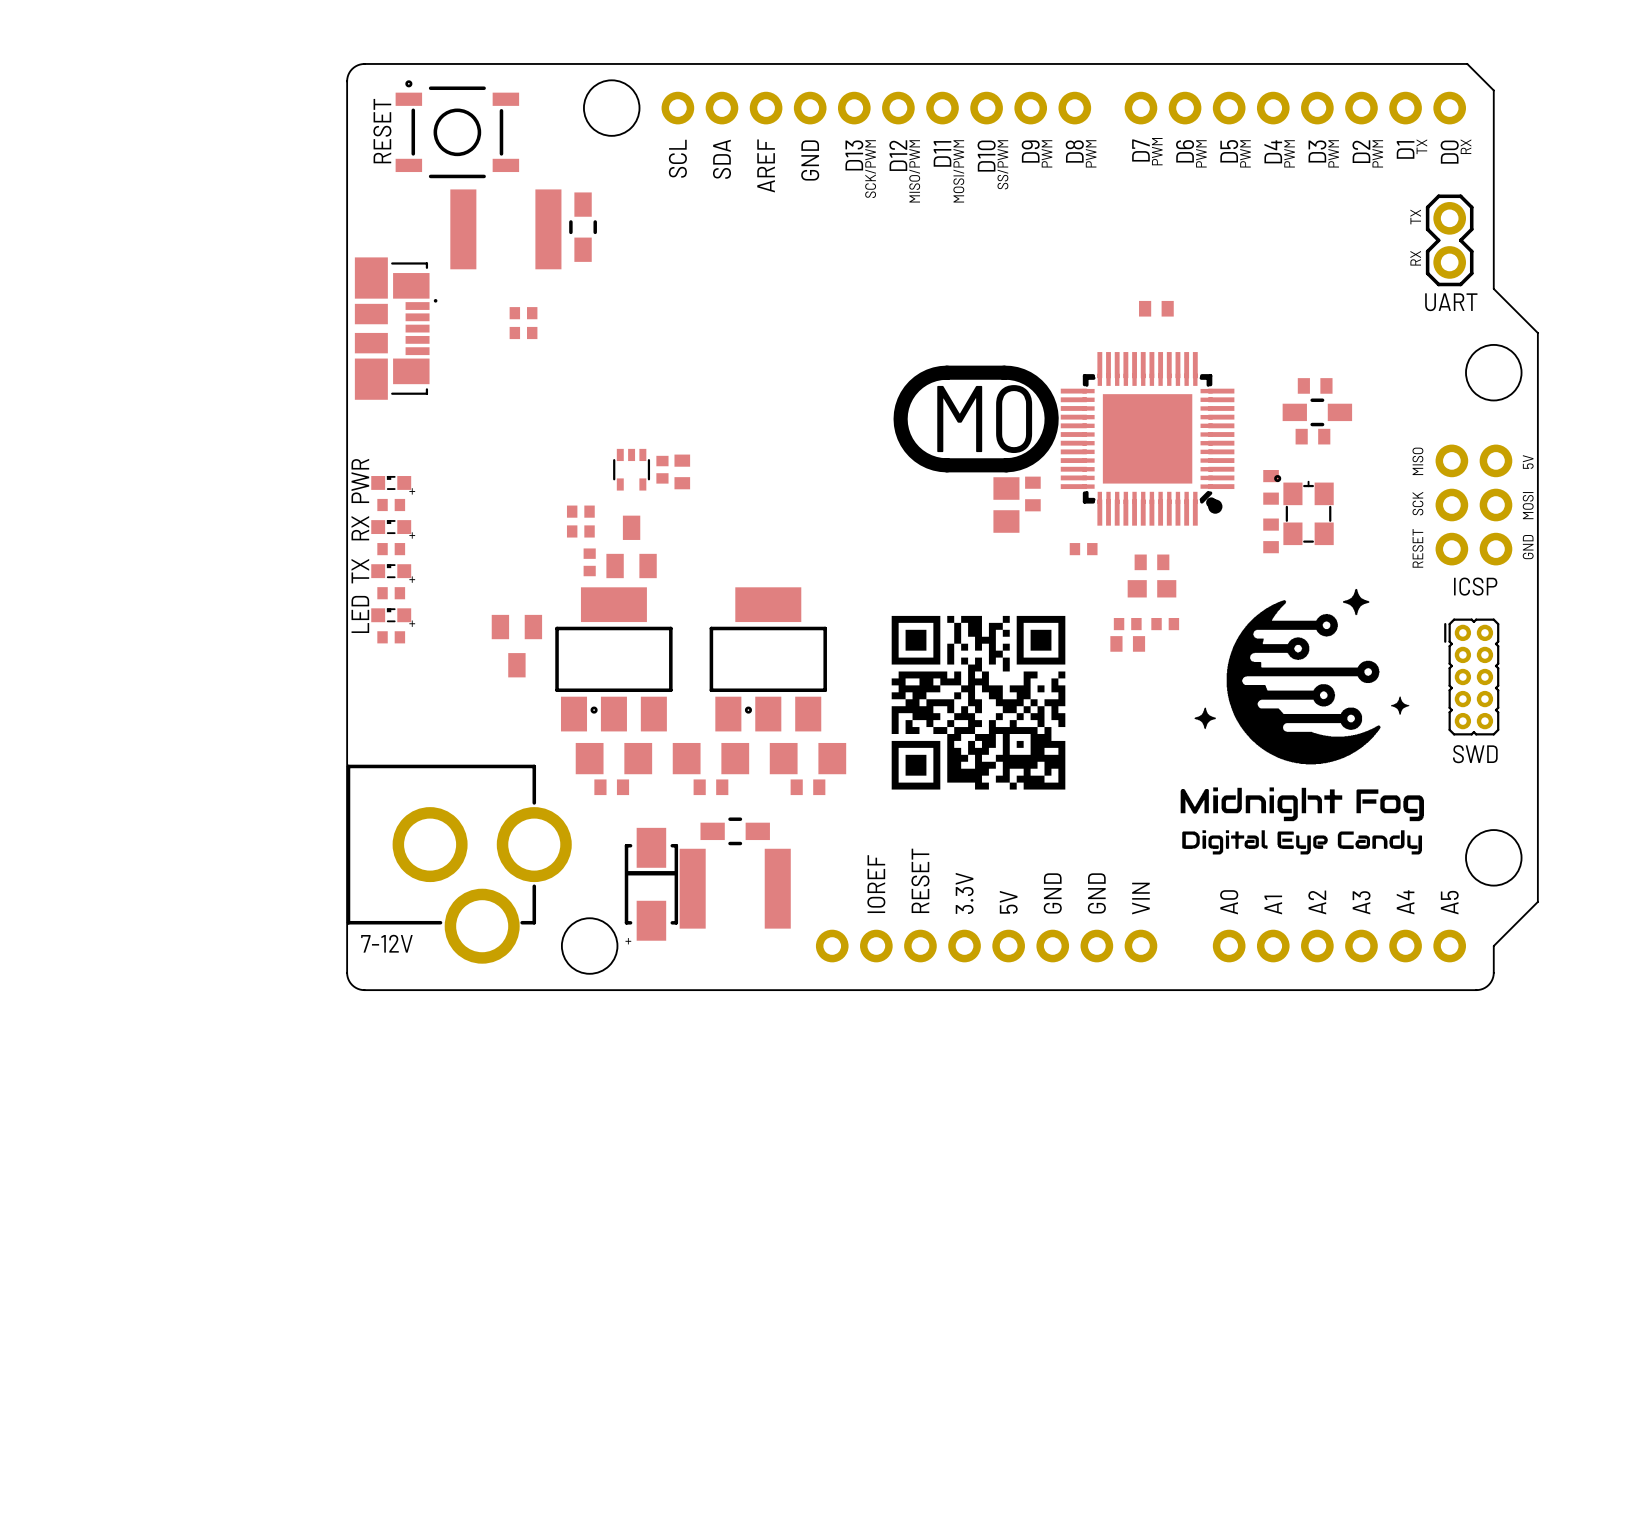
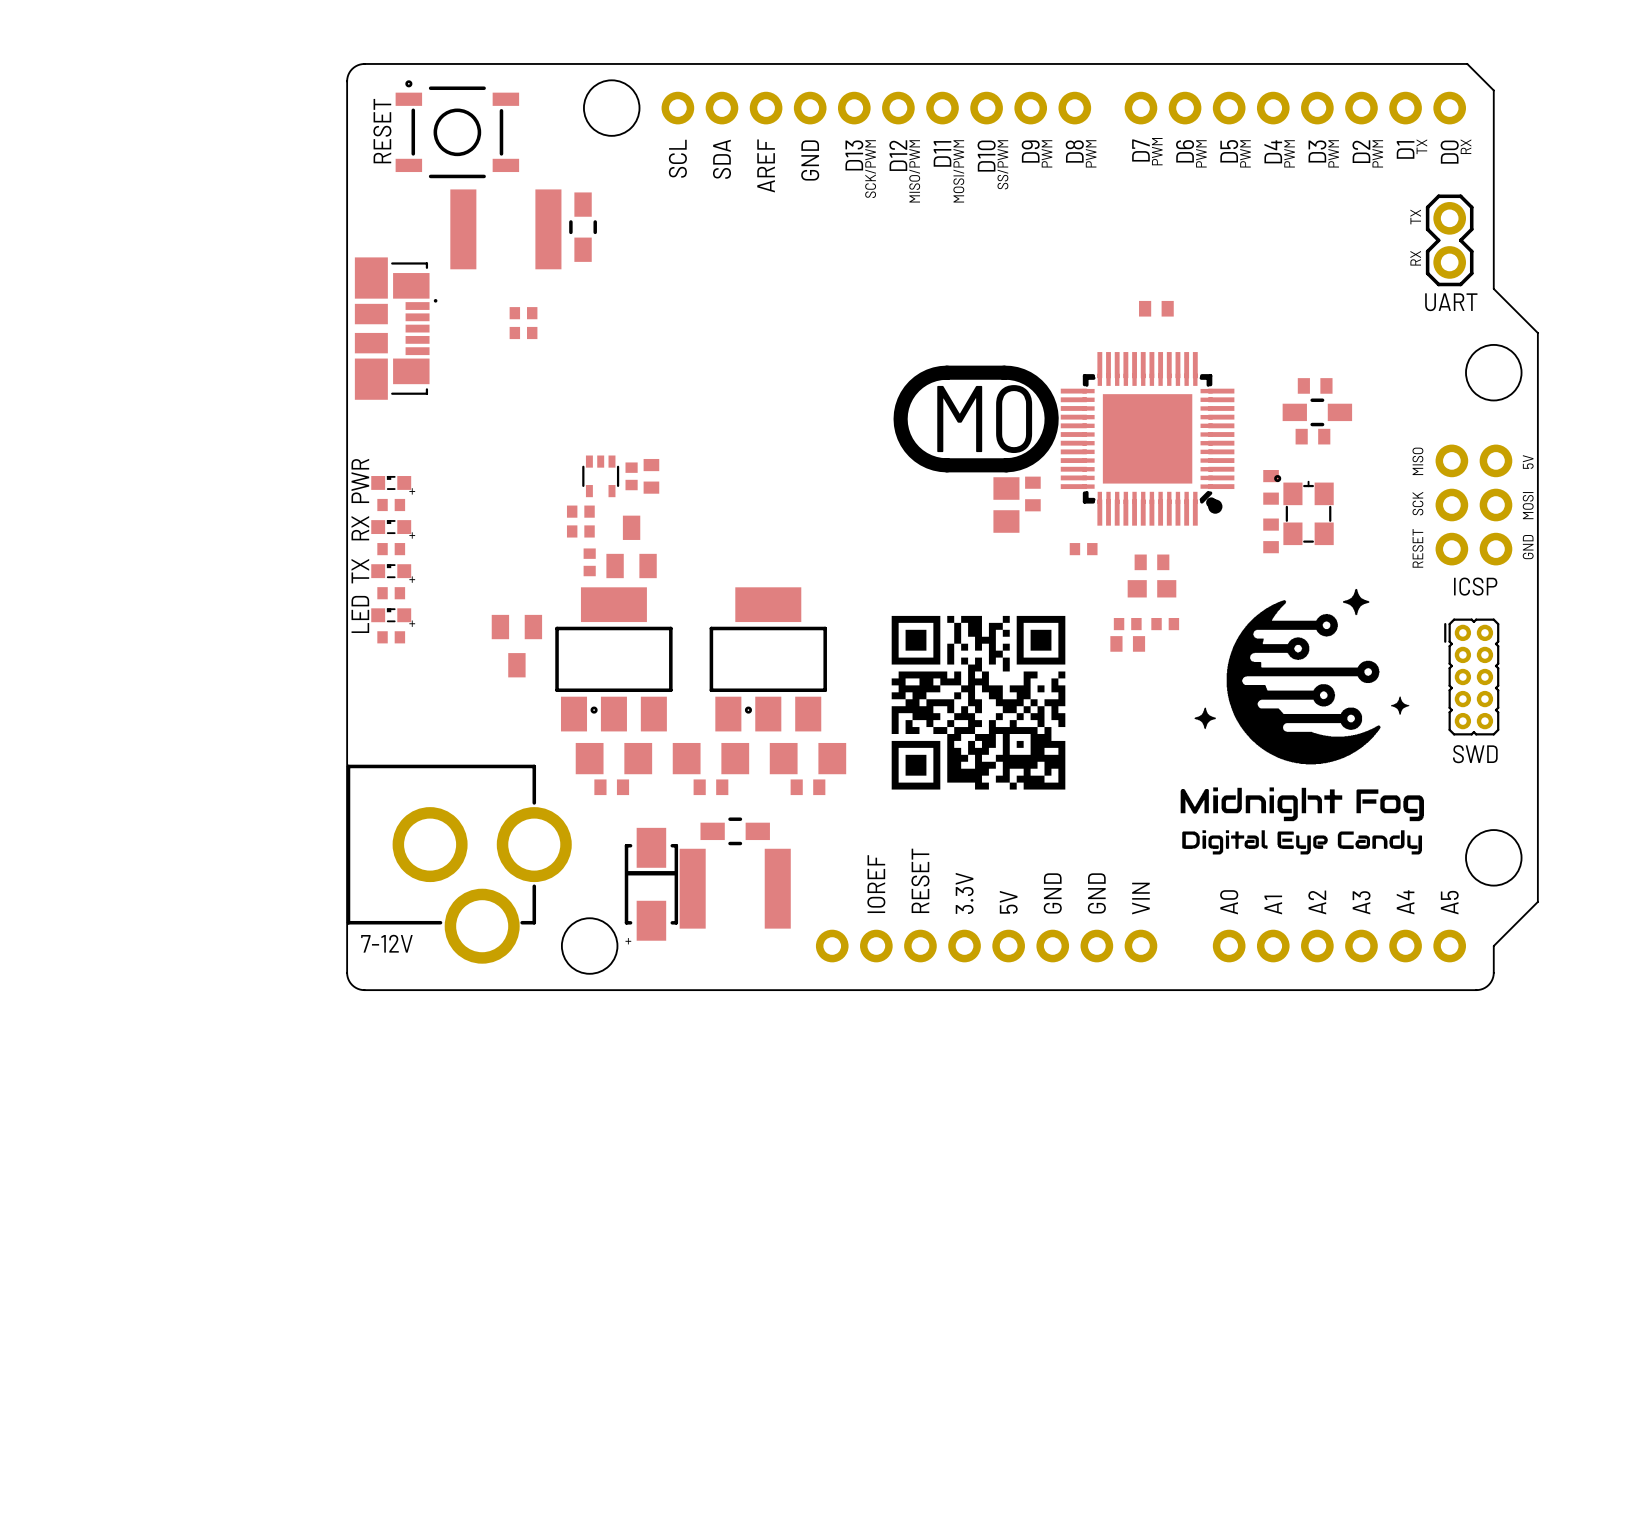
part footprint: [613, 448, 651, 491] -> [625, 462, 638, 491]
part: (662, 469) -> none
part position: (682, 471) -> (651, 476)
part: none -> (600, 476)

